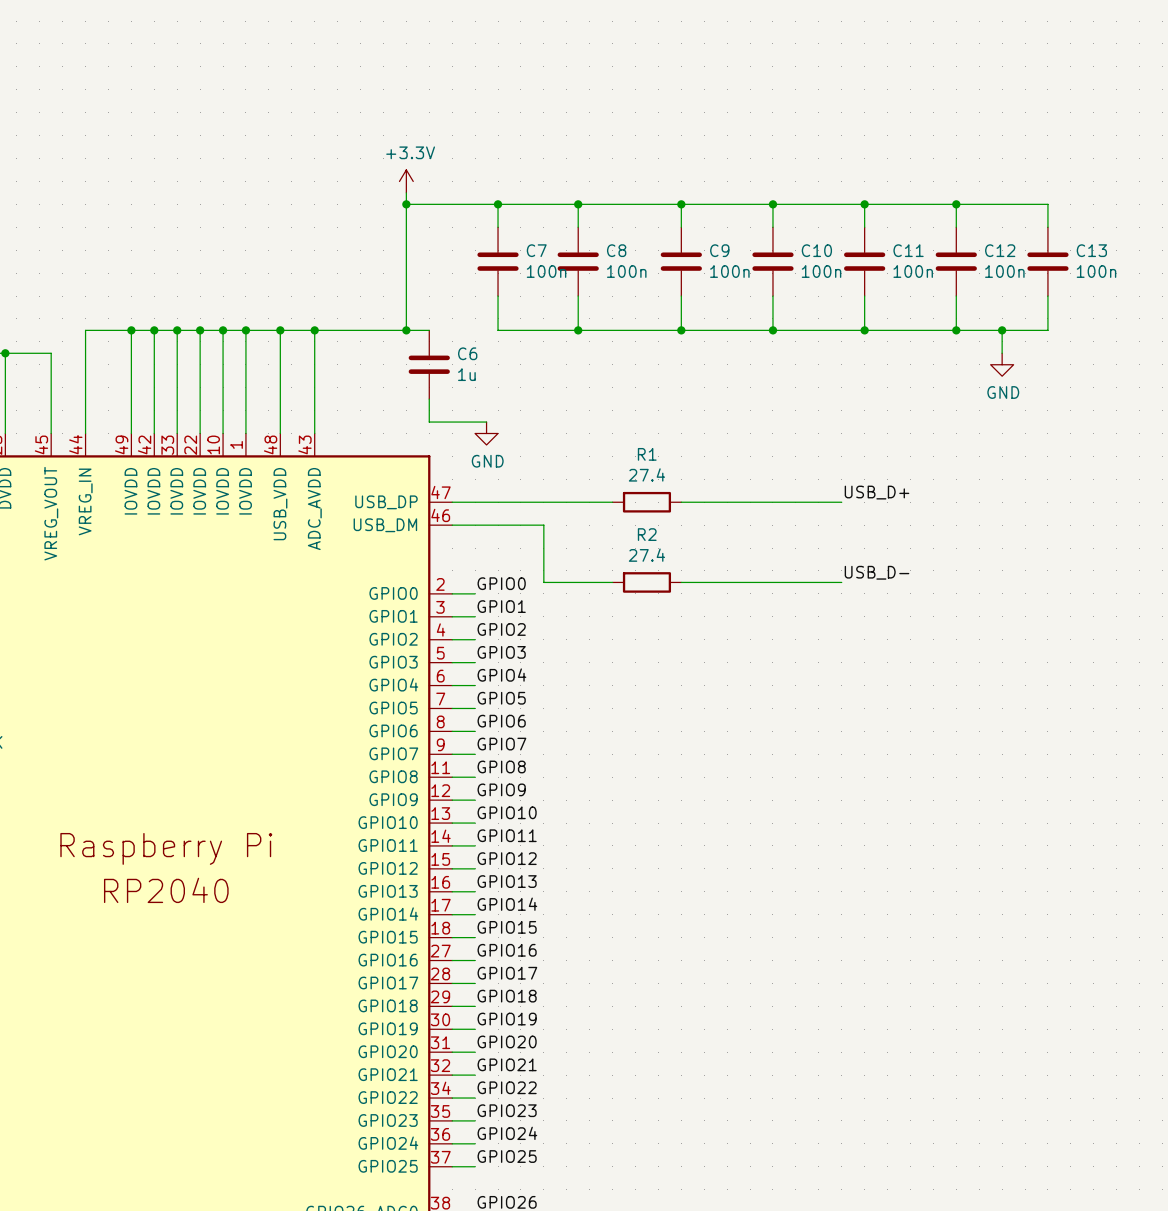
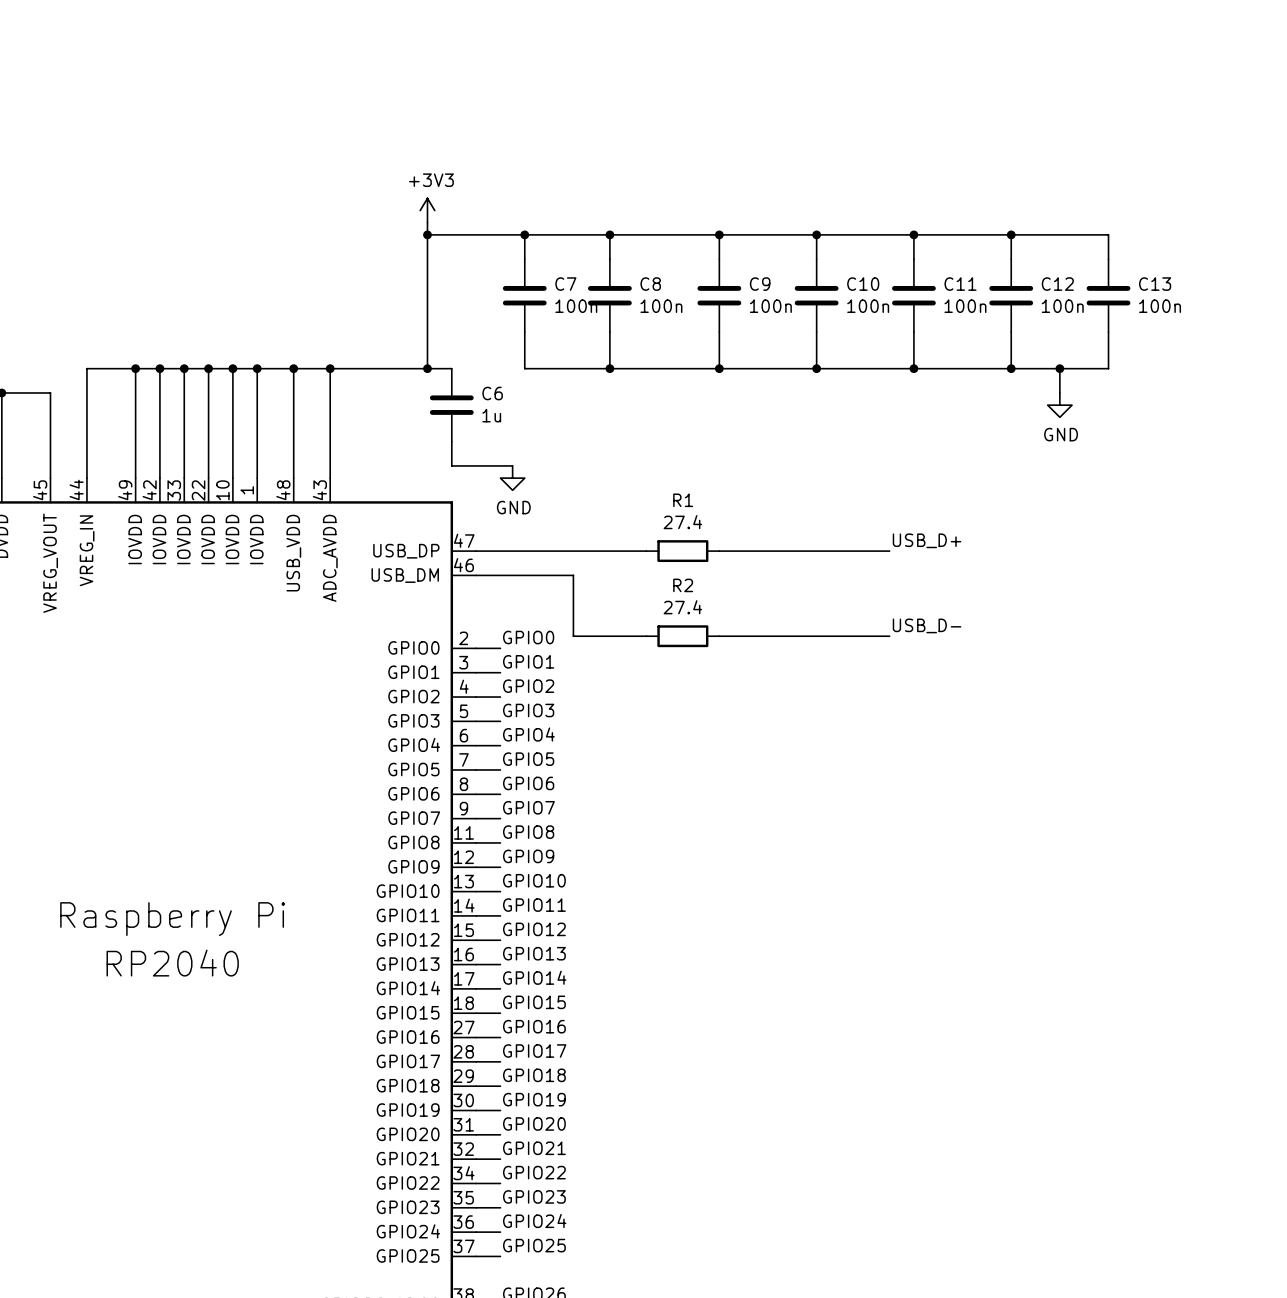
power symbol: +3.3V (406, 181) -> +3V3 (427, 210)

